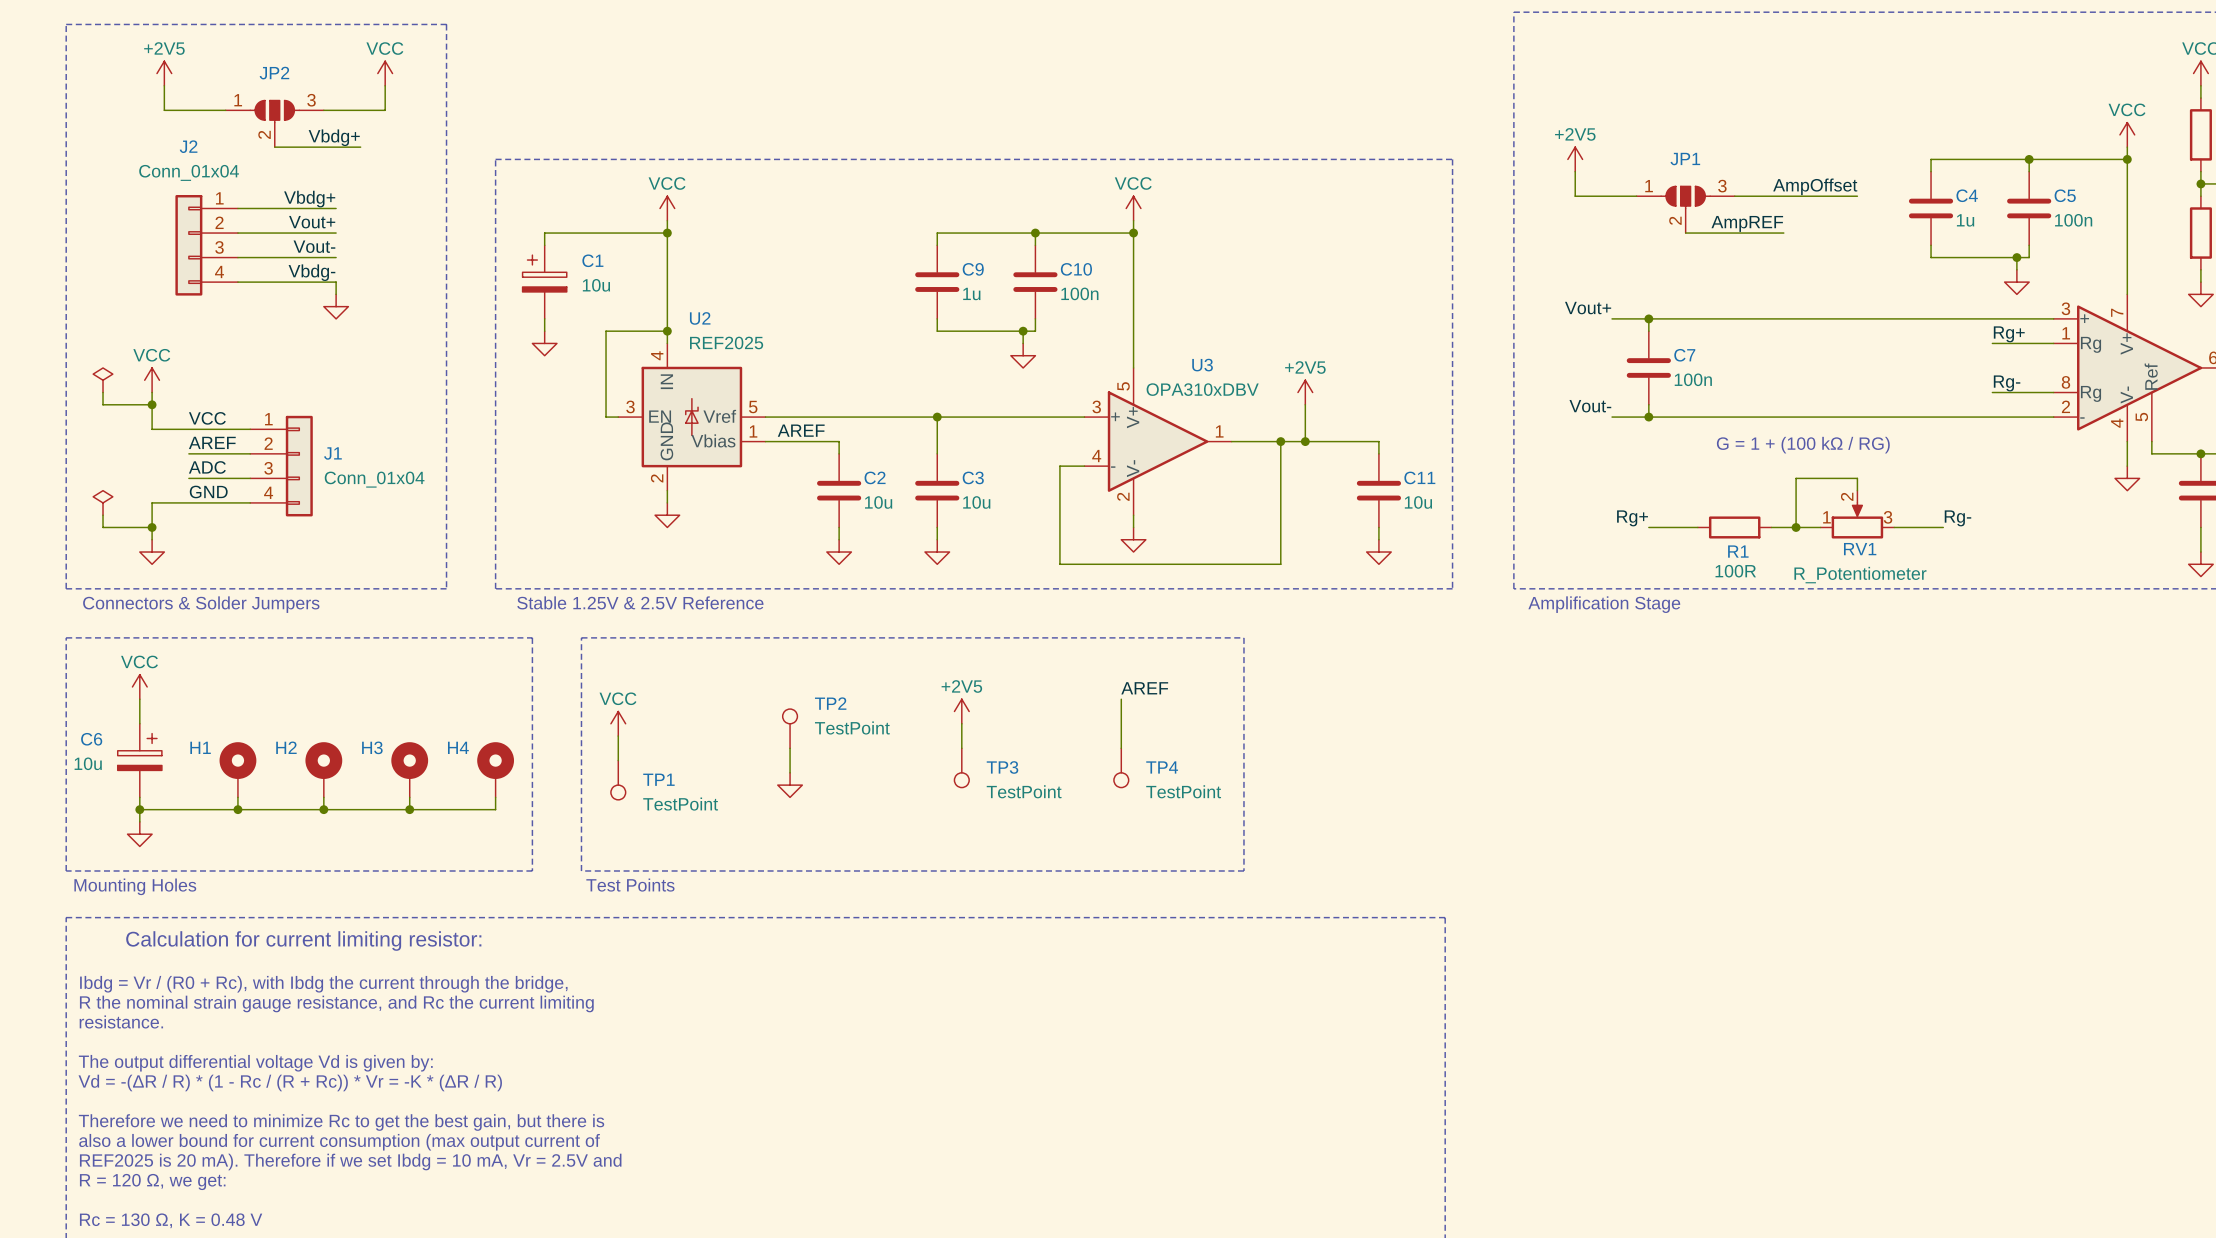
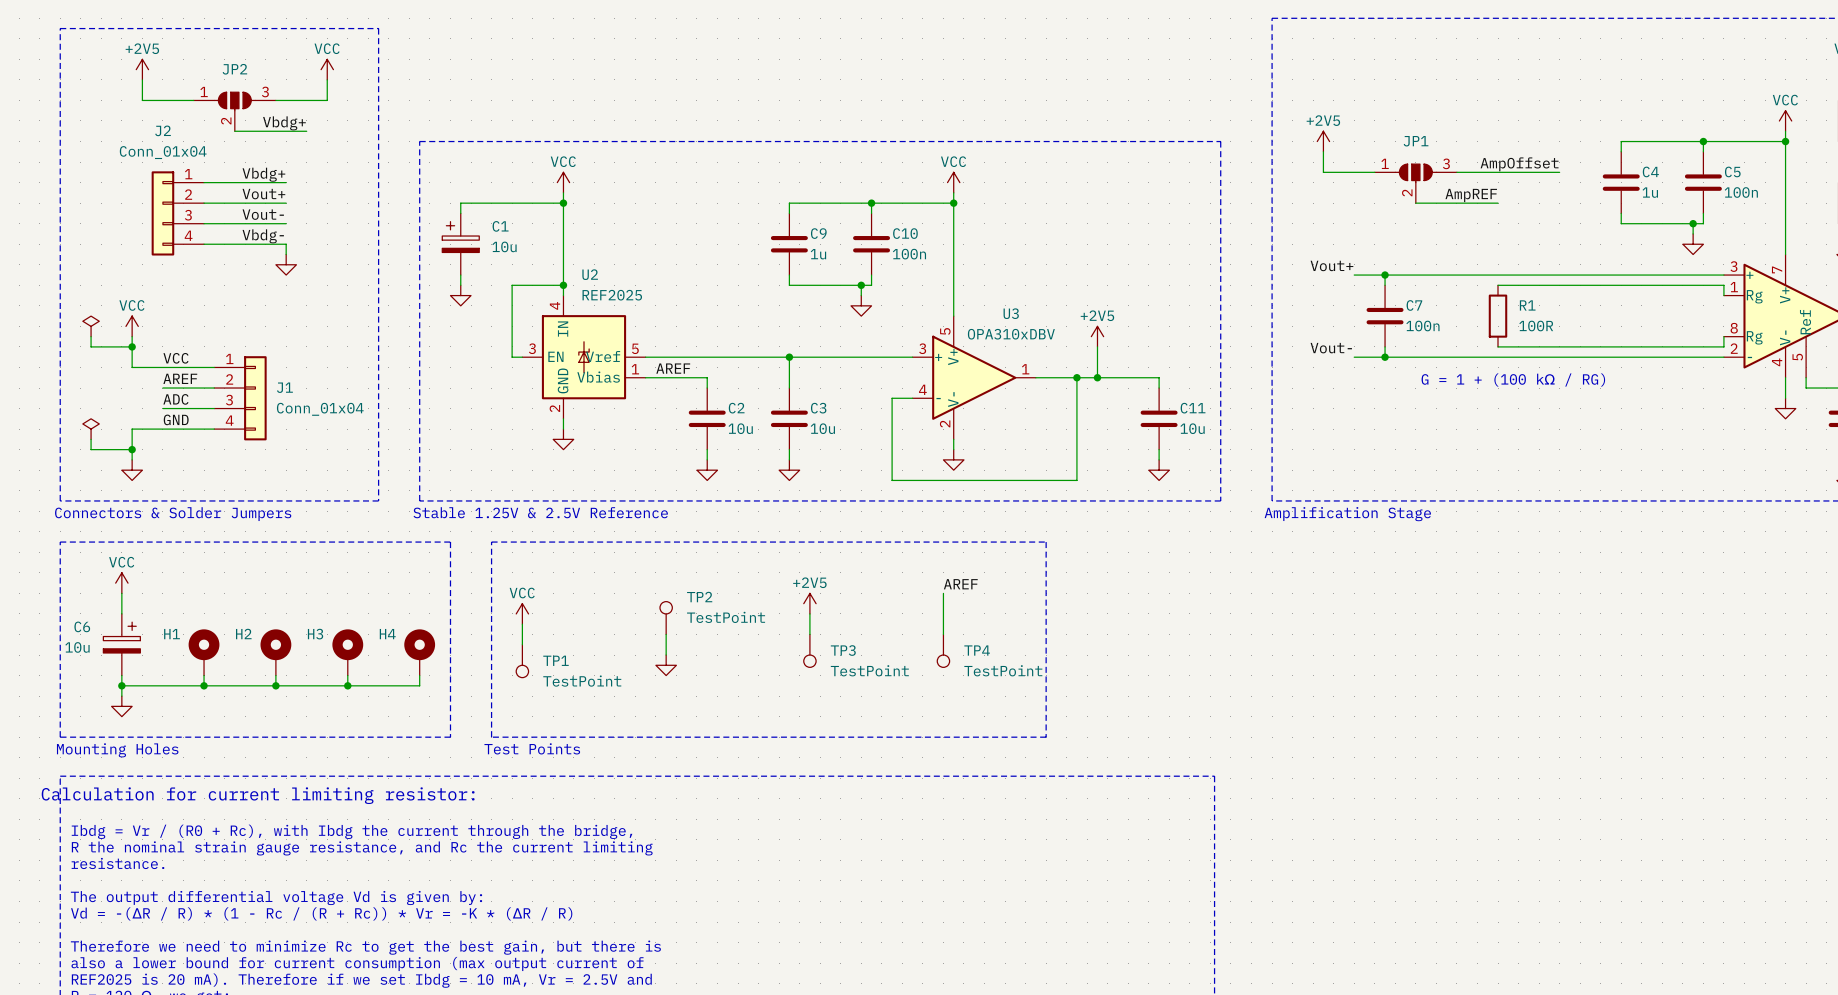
label: Rg+ (2009, 334) -> none
wire: (1992, 343) (2053, 343) -> (1498, 285) (1723, 285) (1723, 295)
label: Rg- (2007, 383) -> none
wire: (1992, 392) (2053, 392) -> (1498, 346) (1723, 346) (1723, 336)
wire: (1857, 490) (1857, 478) (1796, 478) (1796, 527) -> none
RV1: R_Potentiometer (1857, 514) -> none
label: Rg+ (1632, 518) -> none
label: Rg- (1957, 518) -> none
wire: (1648, 527) (1697, 527) -> none
R1 rotation: 0° (1734, 527) -> 90° clockwise (1498, 316)
R1 position: (1734, 527) -> (1498, 316)
wire: (1771, 527) (1820, 527) -> none
junction: (1796, 527) -> none
wire: (1894, 527) (1943, 527) -> none
R1 name position: R1 (1738, 551) -> R1 (1527, 305)
R1 value position: 100R (1735, 571) -> 100R (1536, 326)

